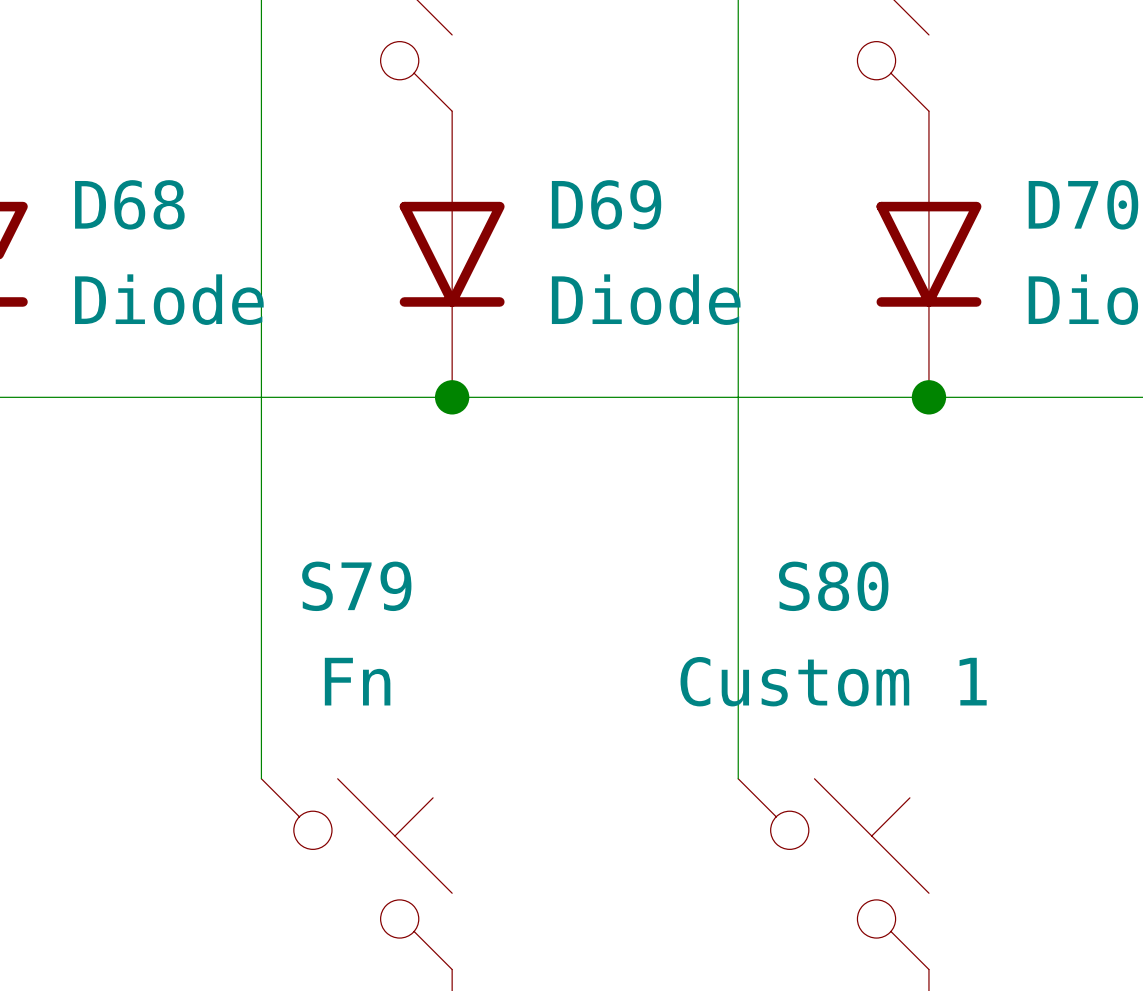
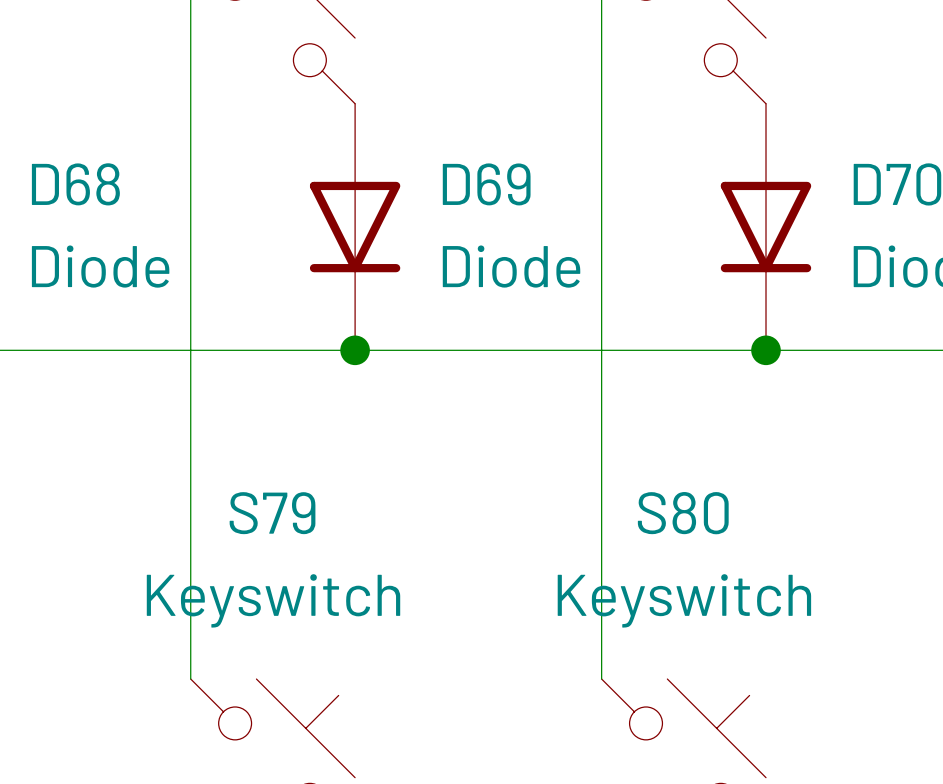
S79 value: Fn (357, 681) -> Keyswitch (273, 600)
S80 value: Custom 1 (833, 681) -> Keyswitch (684, 600)

